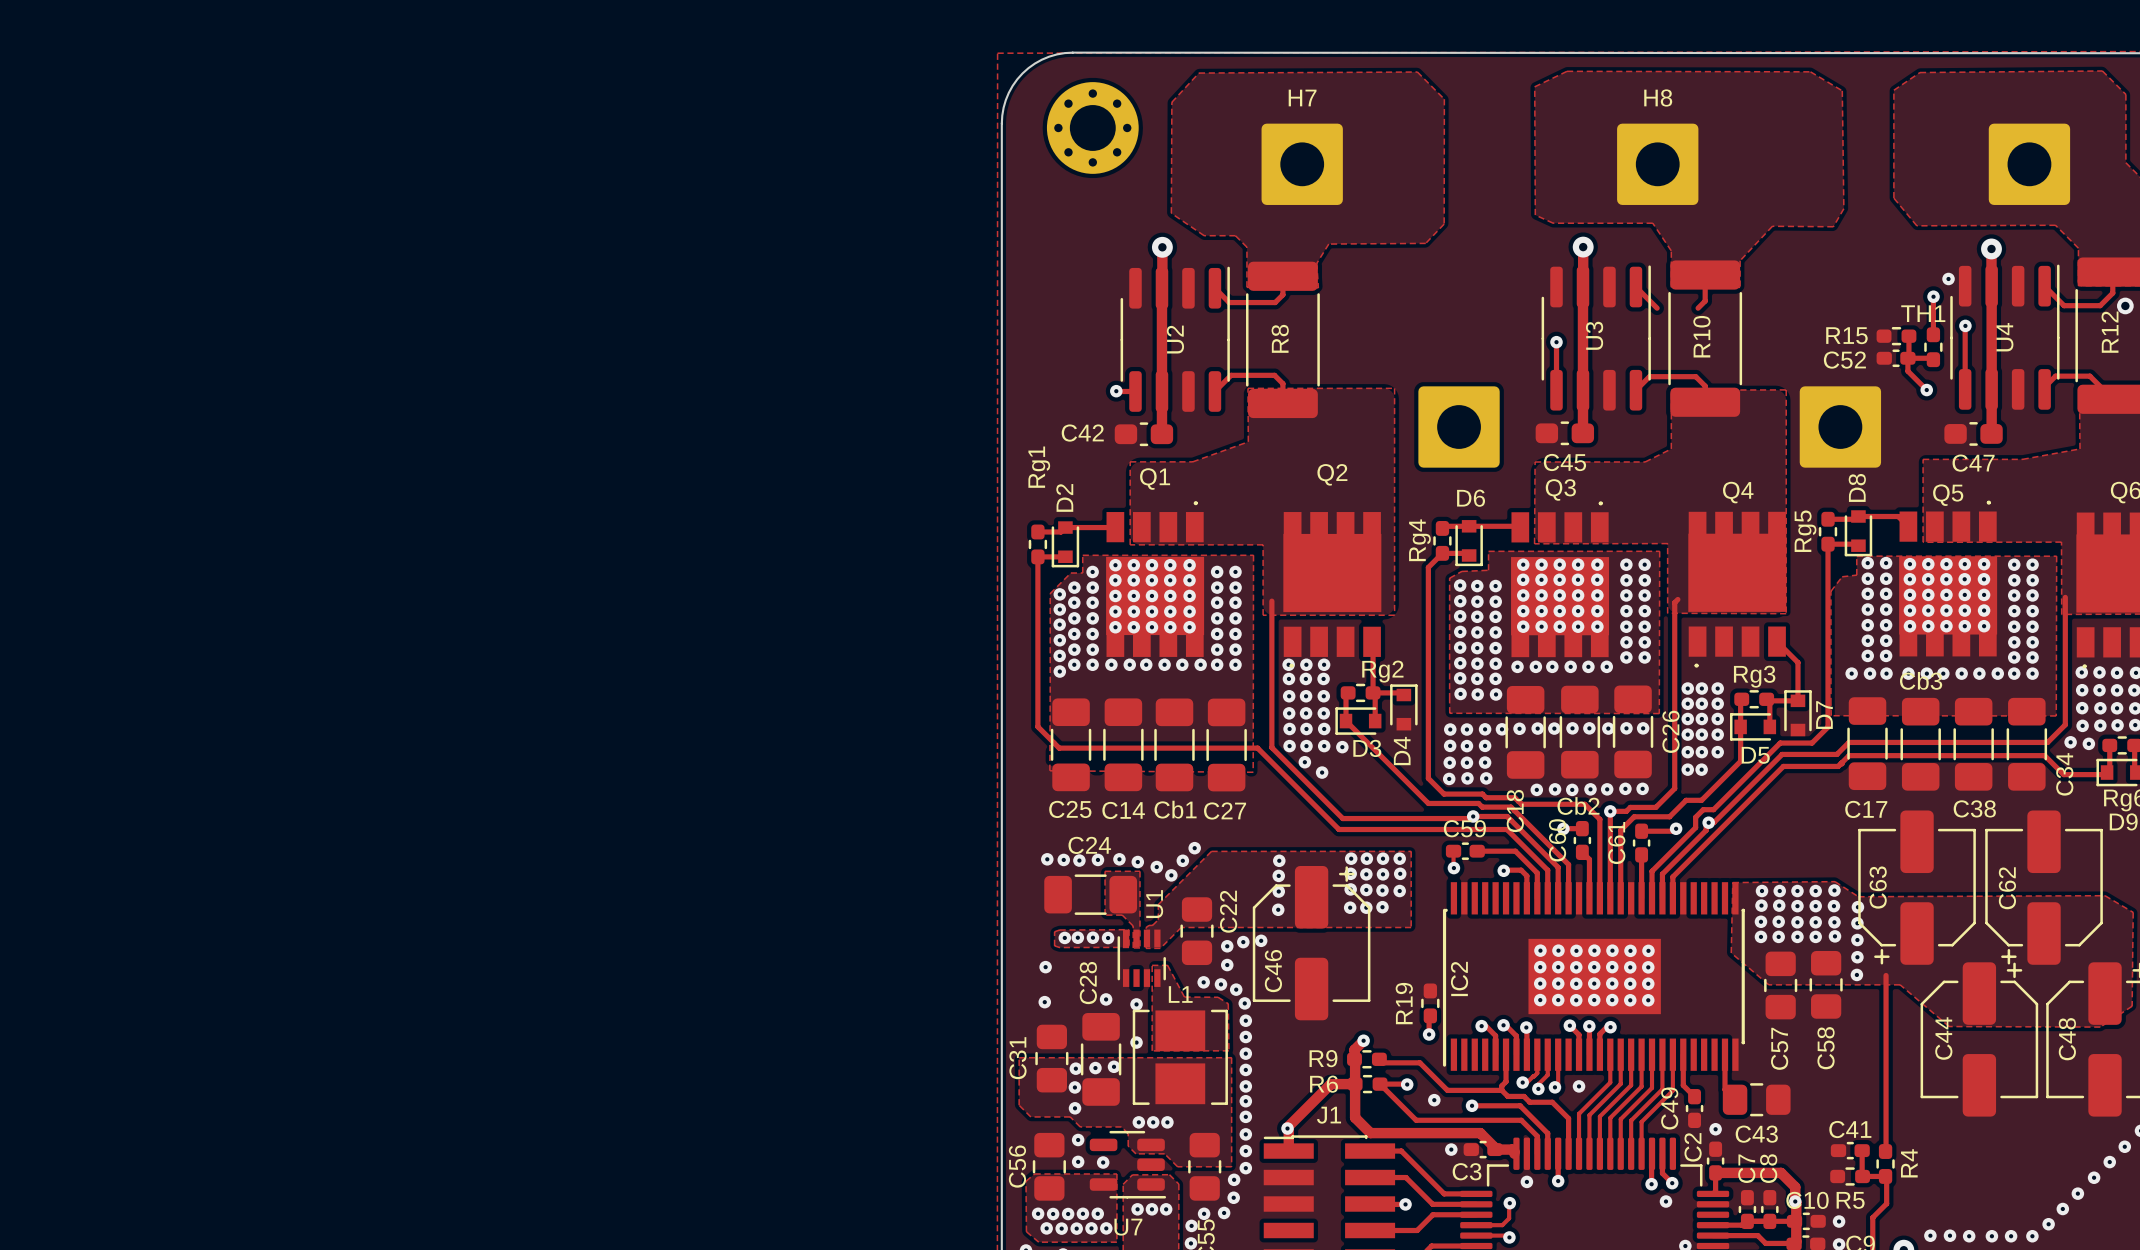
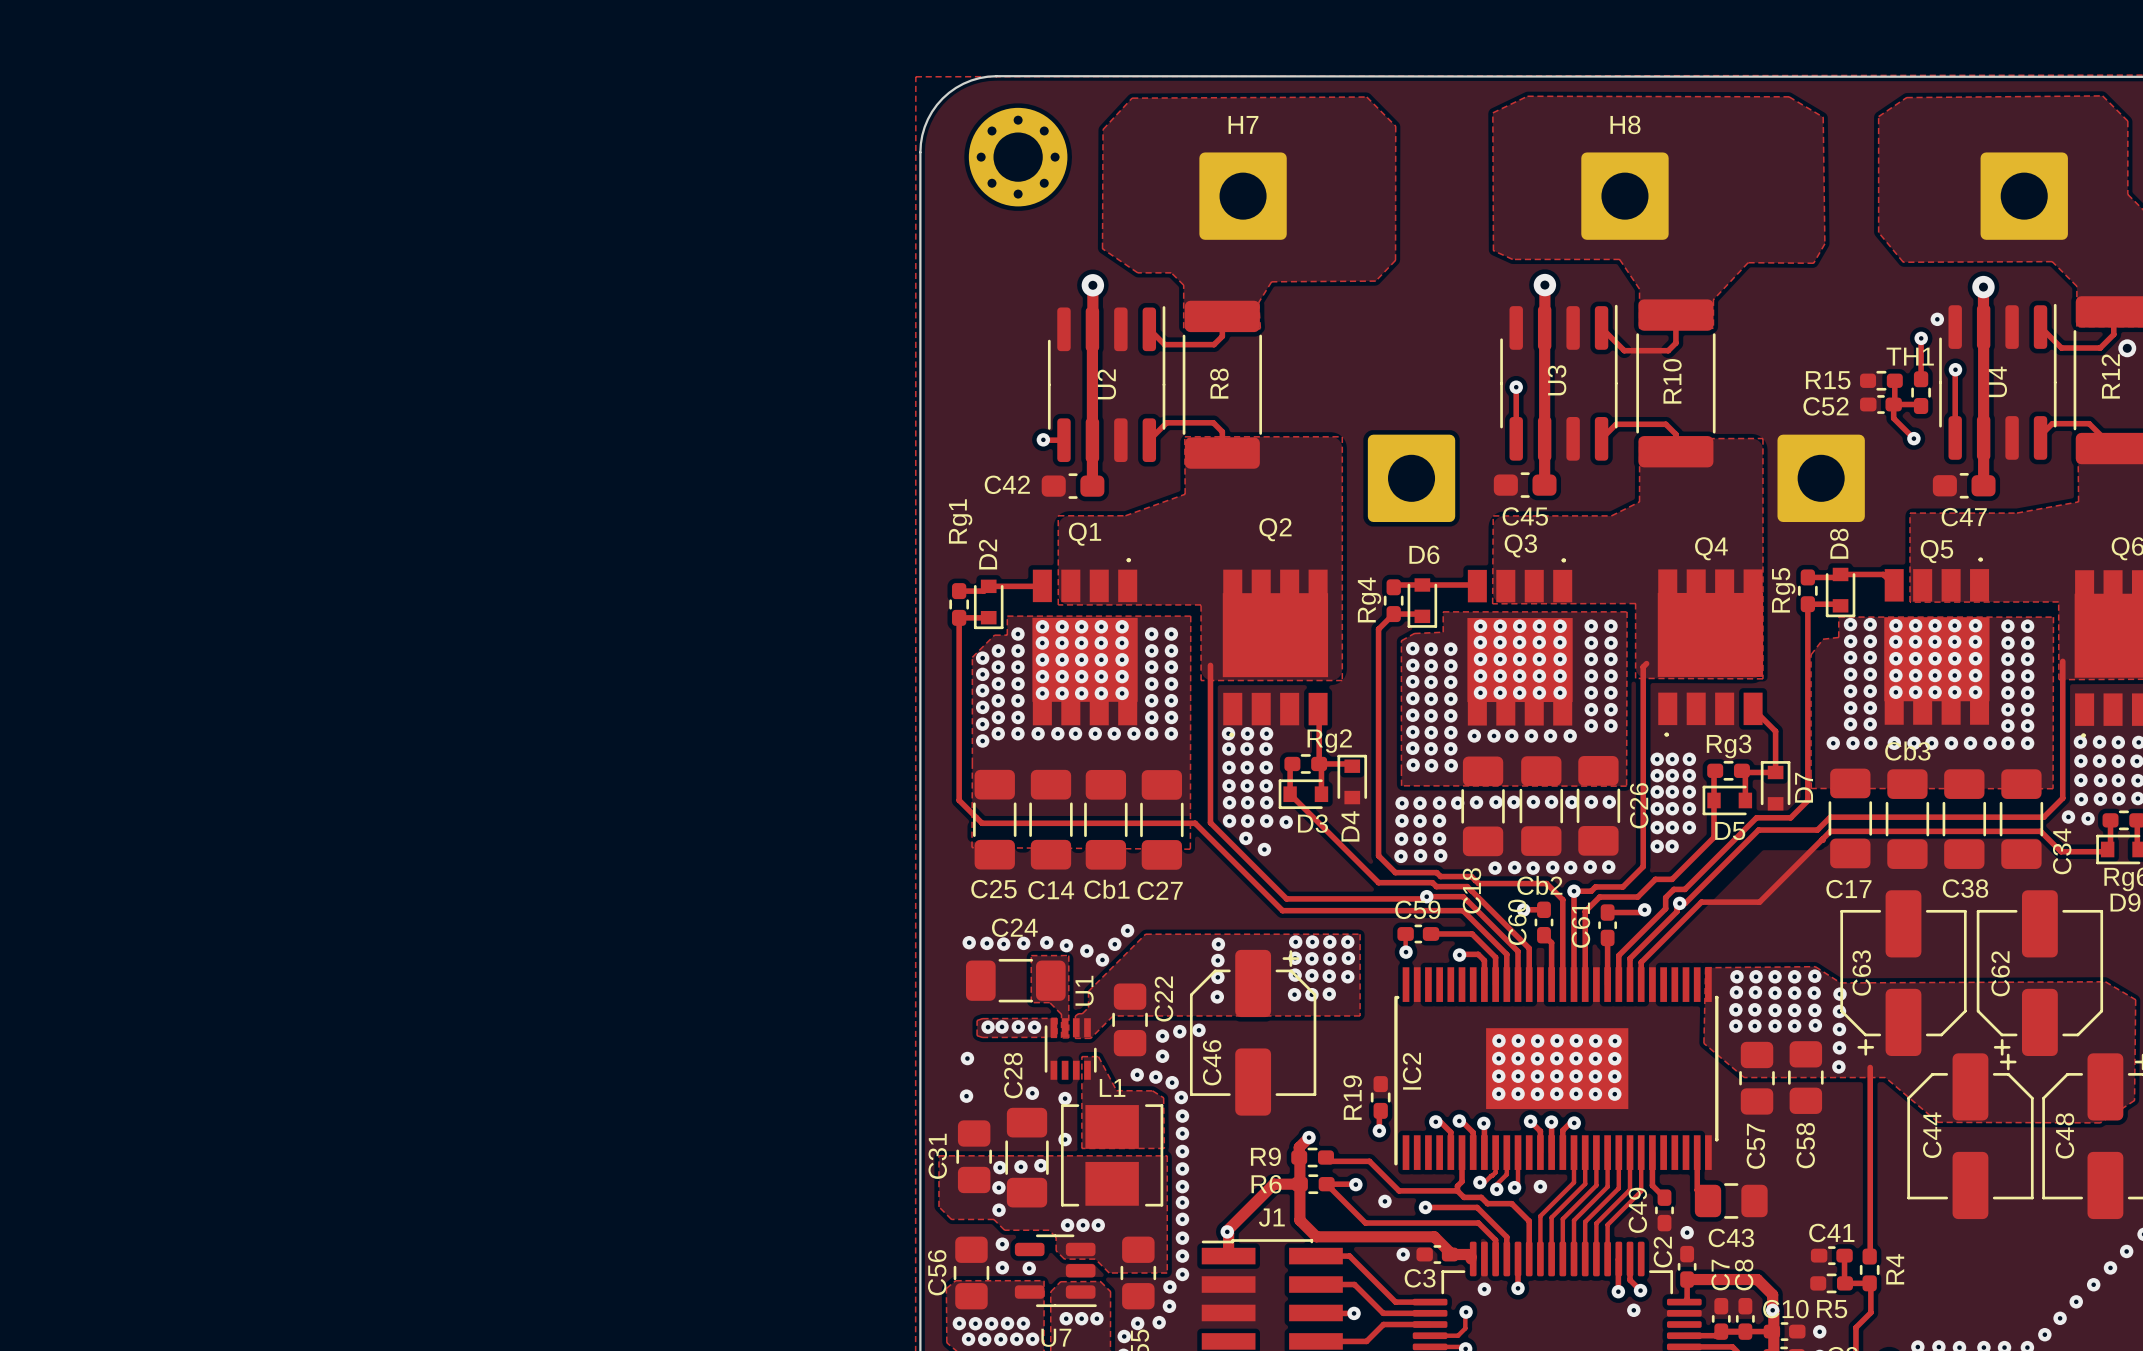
track: none -> (1624, 350) (1668, 350)
track: (1838, 766) (1783, 766) (1672, 877) -> (1818, 842) (1759, 902) (1701, 902) (1641, 962)

